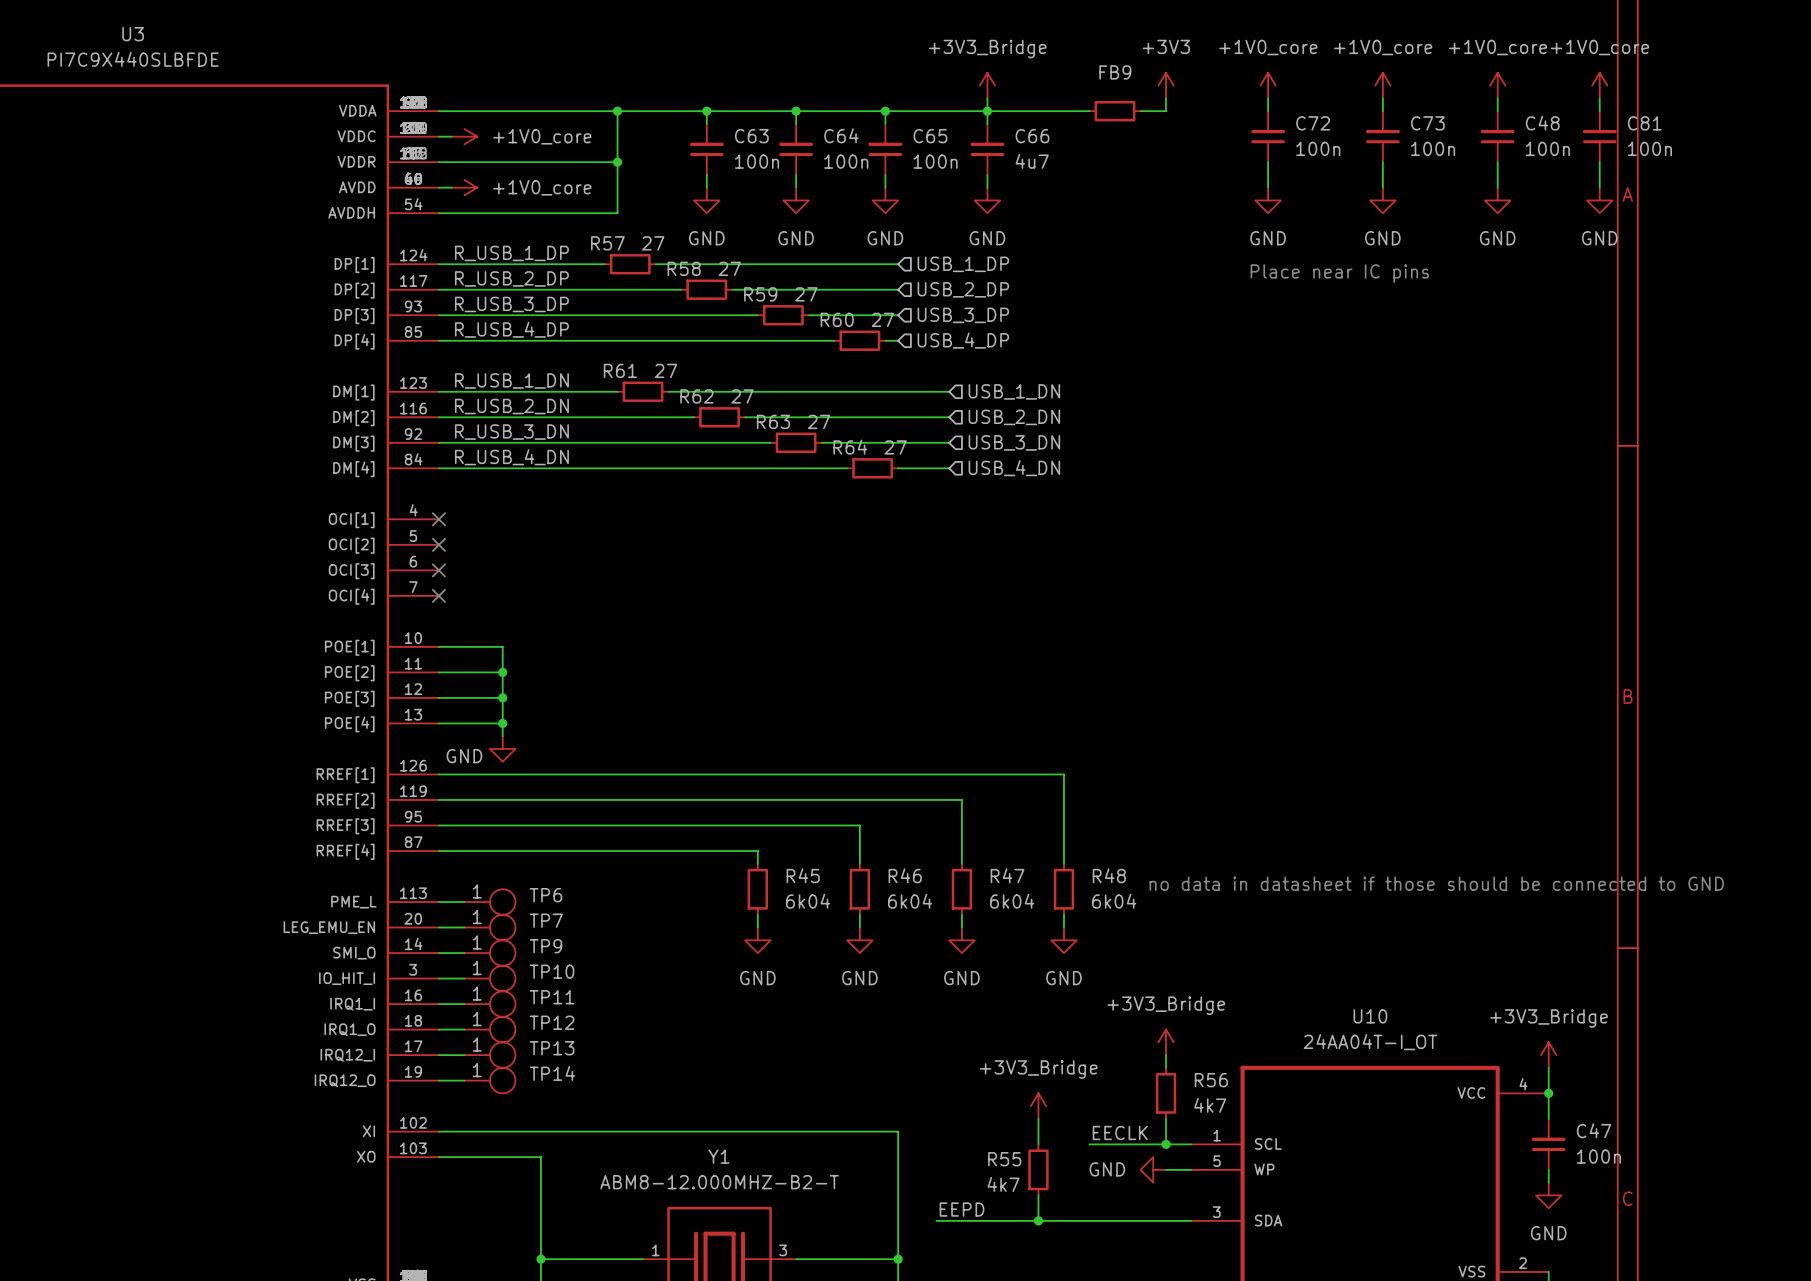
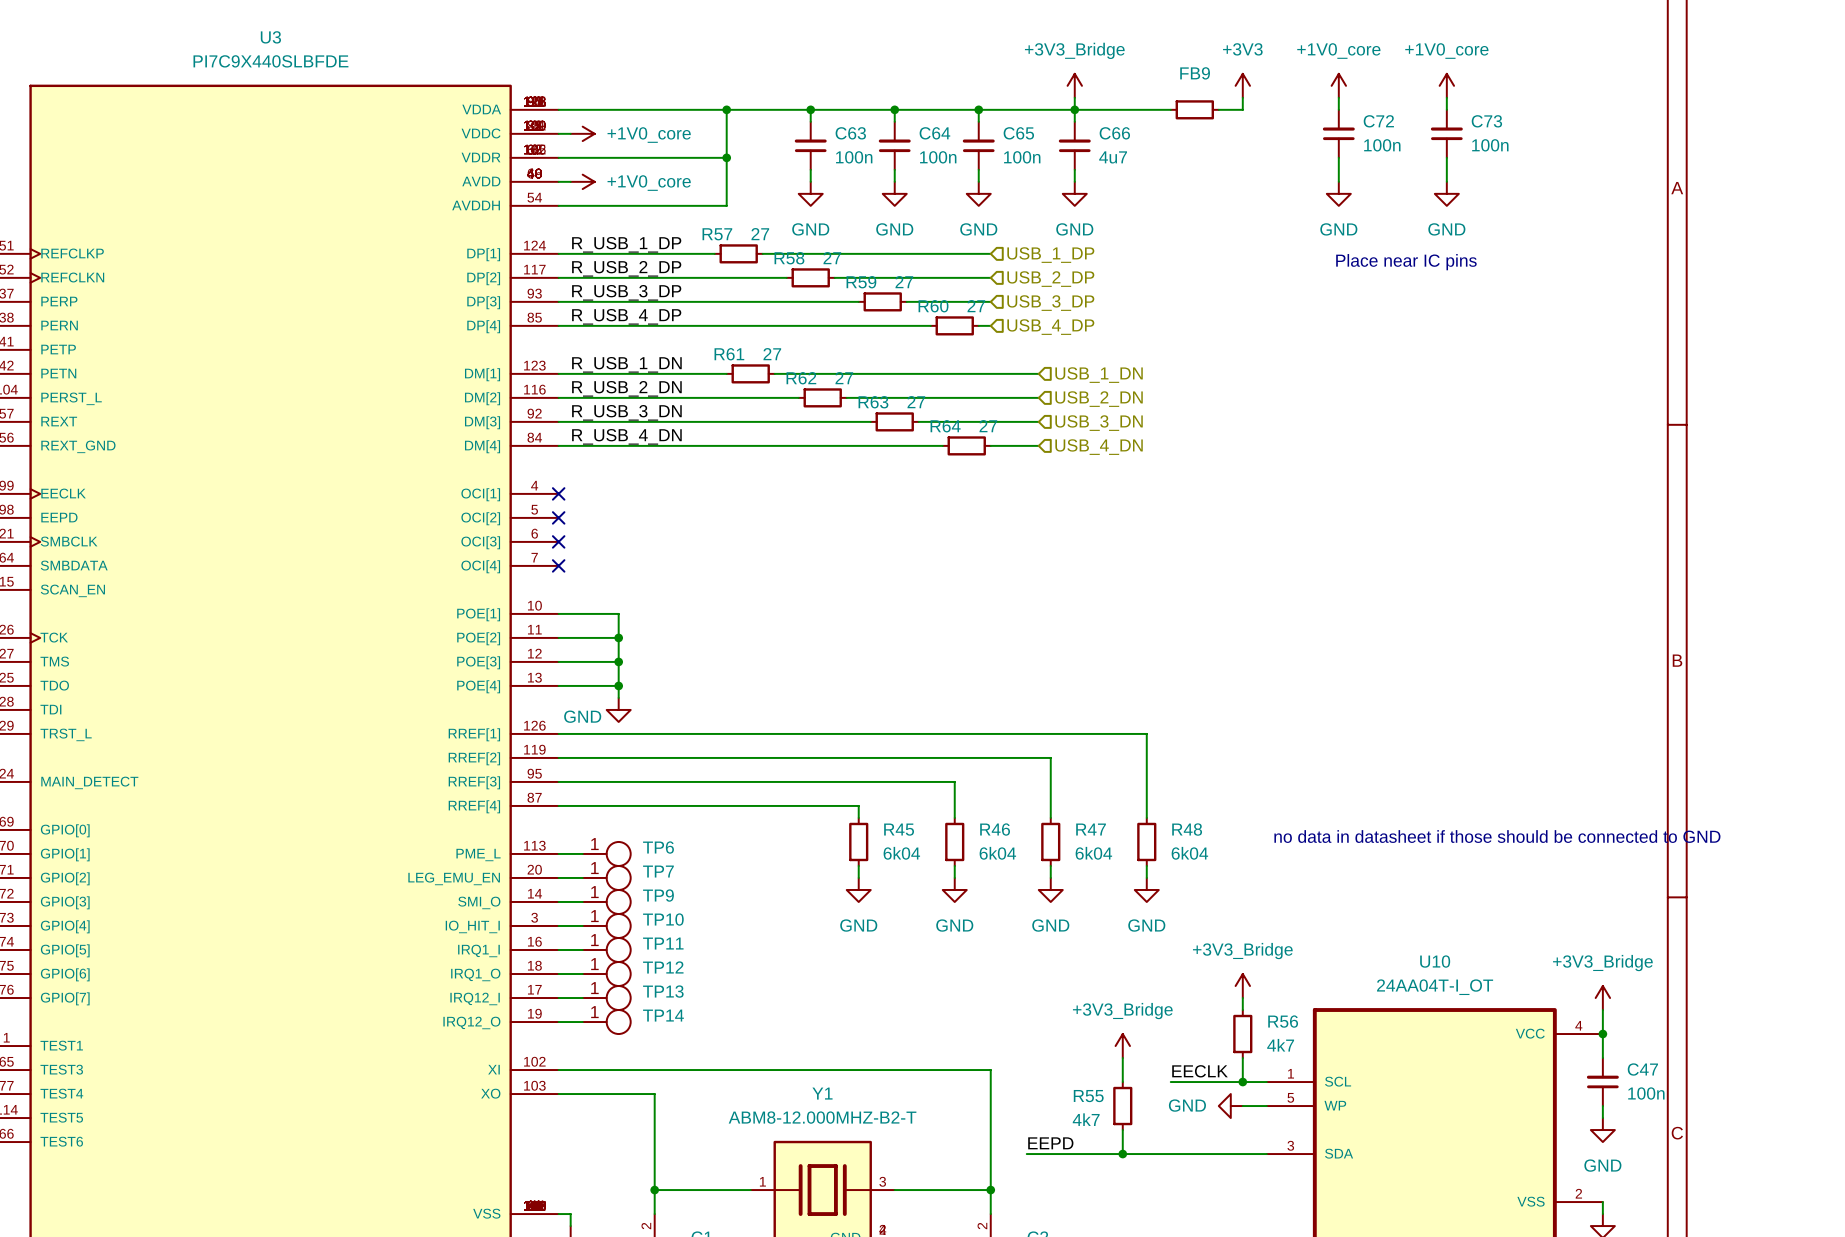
power symbol: +1V0_core (1497, 85) -> none
power symbol: +1V0_core (1599, 85) -> none
wire: (1497, 98) (1497, 111) -> none
wire: (1599, 98) (1599, 111) -> none
C48: (1497, 136) -> none
C81: (1599, 136) -> none
wire: (1497, 162) (1497, 187) -> none
wire: (1599, 162) (1599, 187) -> none
power symbol: GND (1497, 200) -> none
power symbol: GND (1599, 200) -> none

